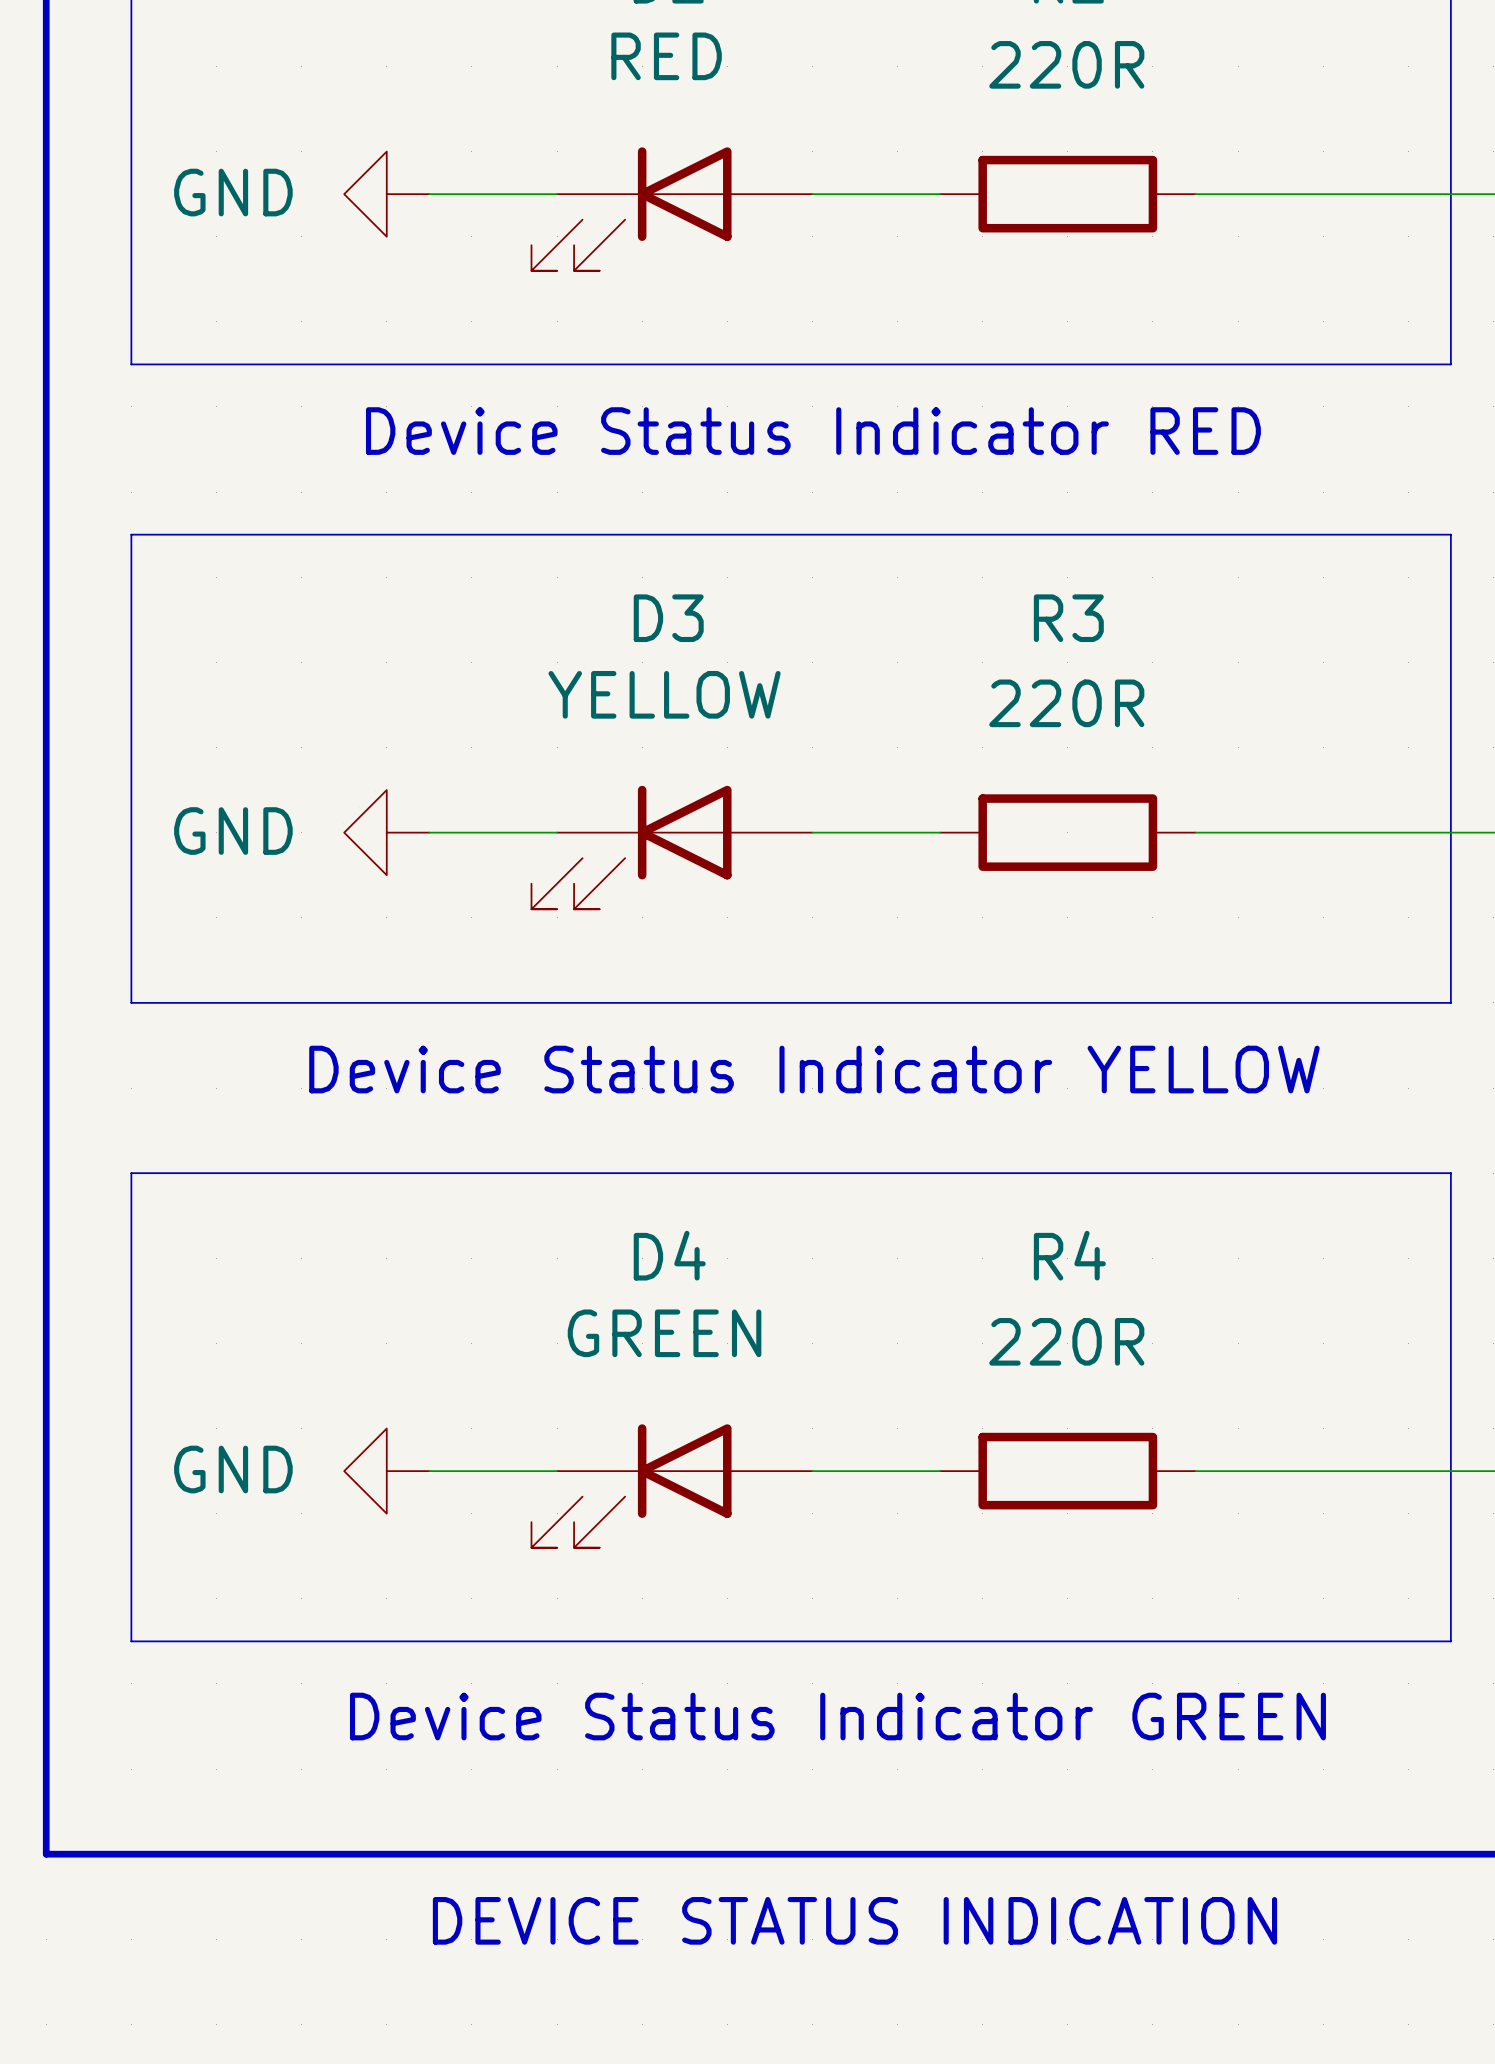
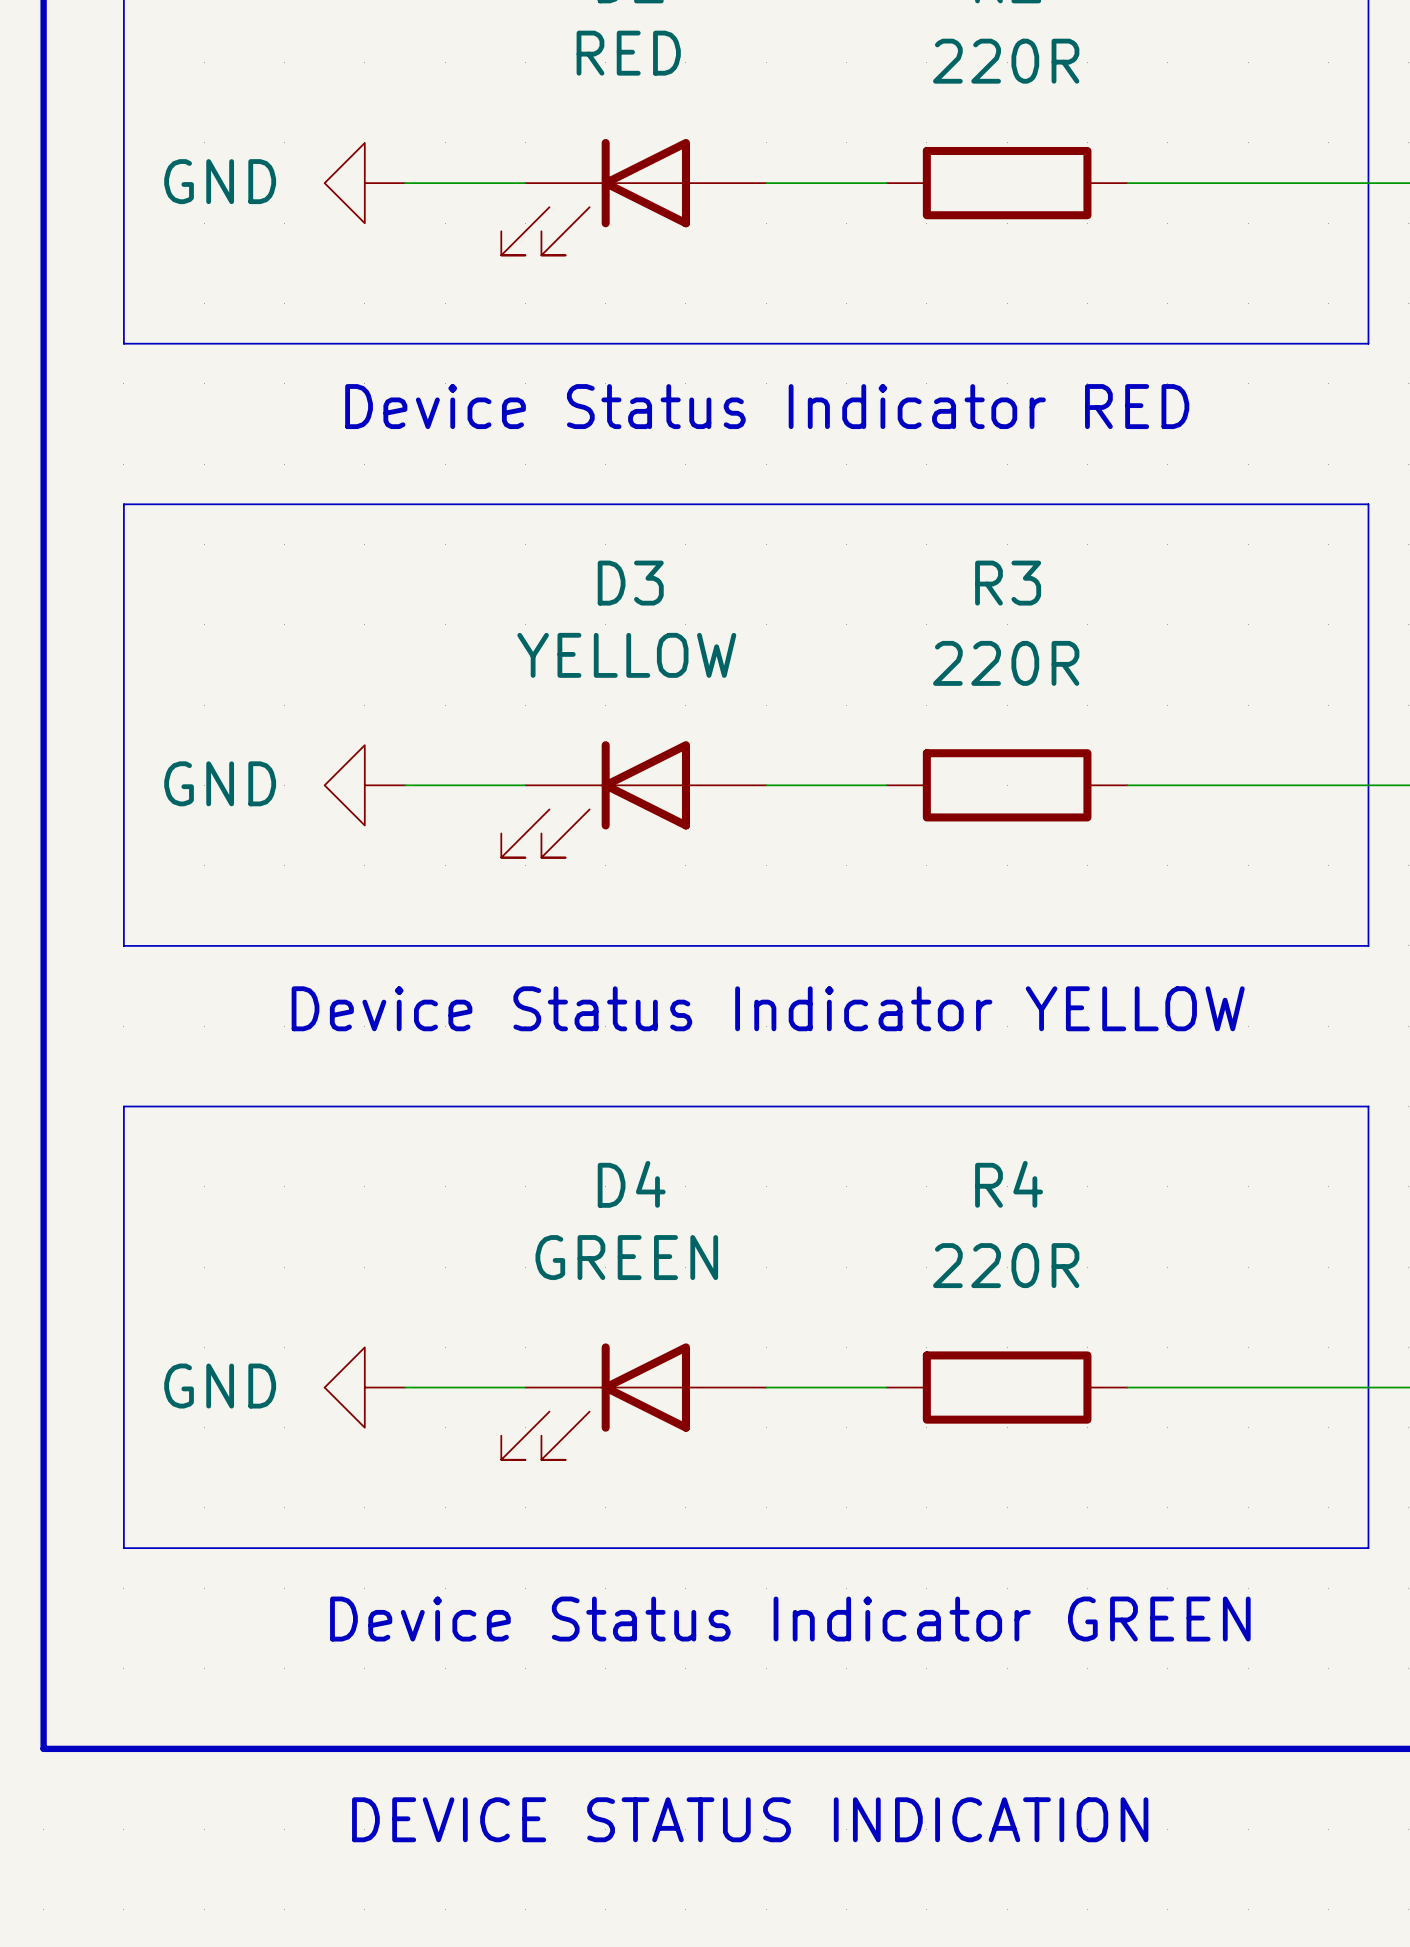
text position: DEVICE STATUS INDICATION (854, 1920) -> DEVICE STATUS INDICATION (750, 1819)

